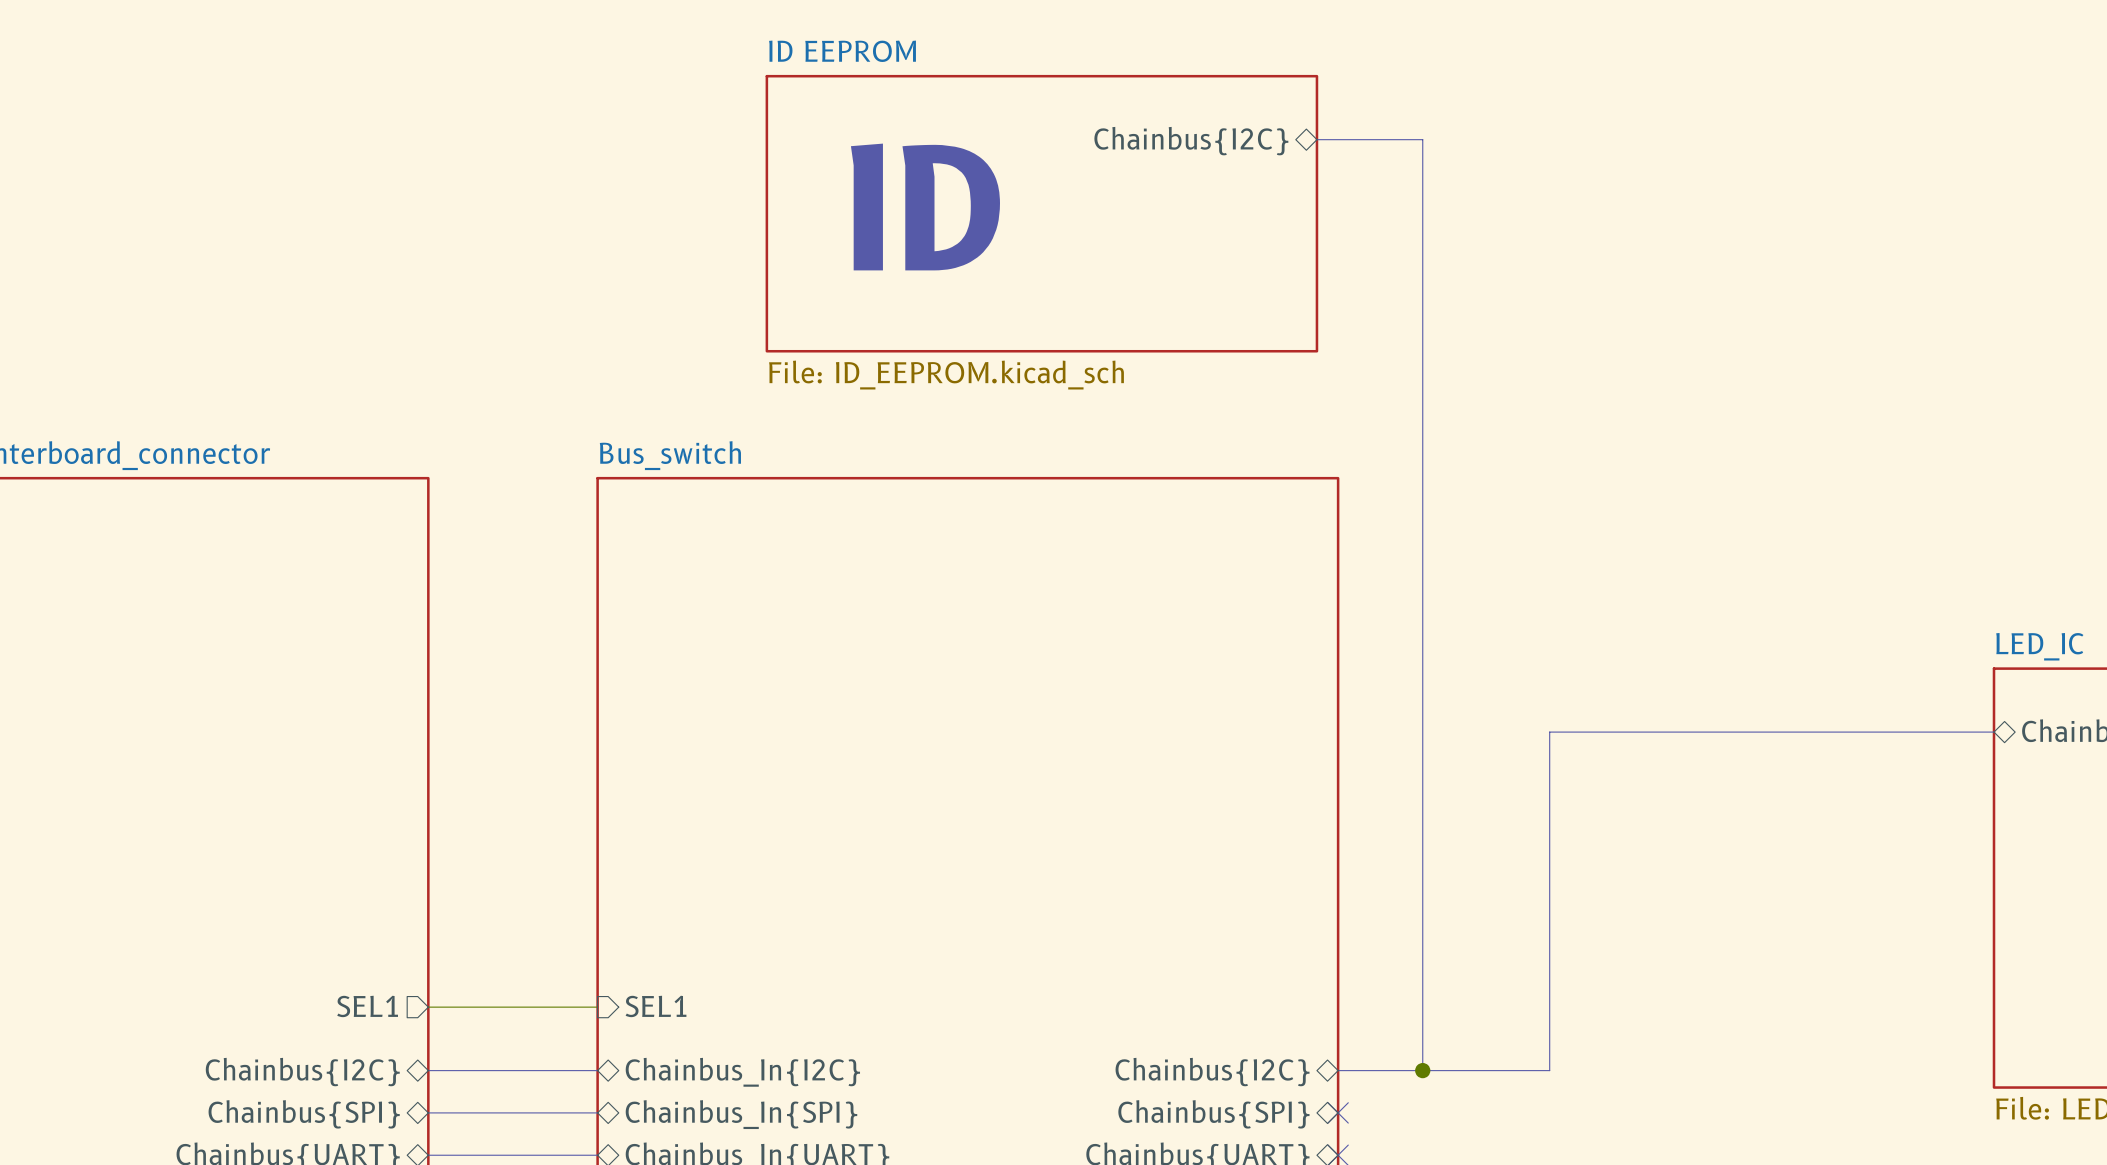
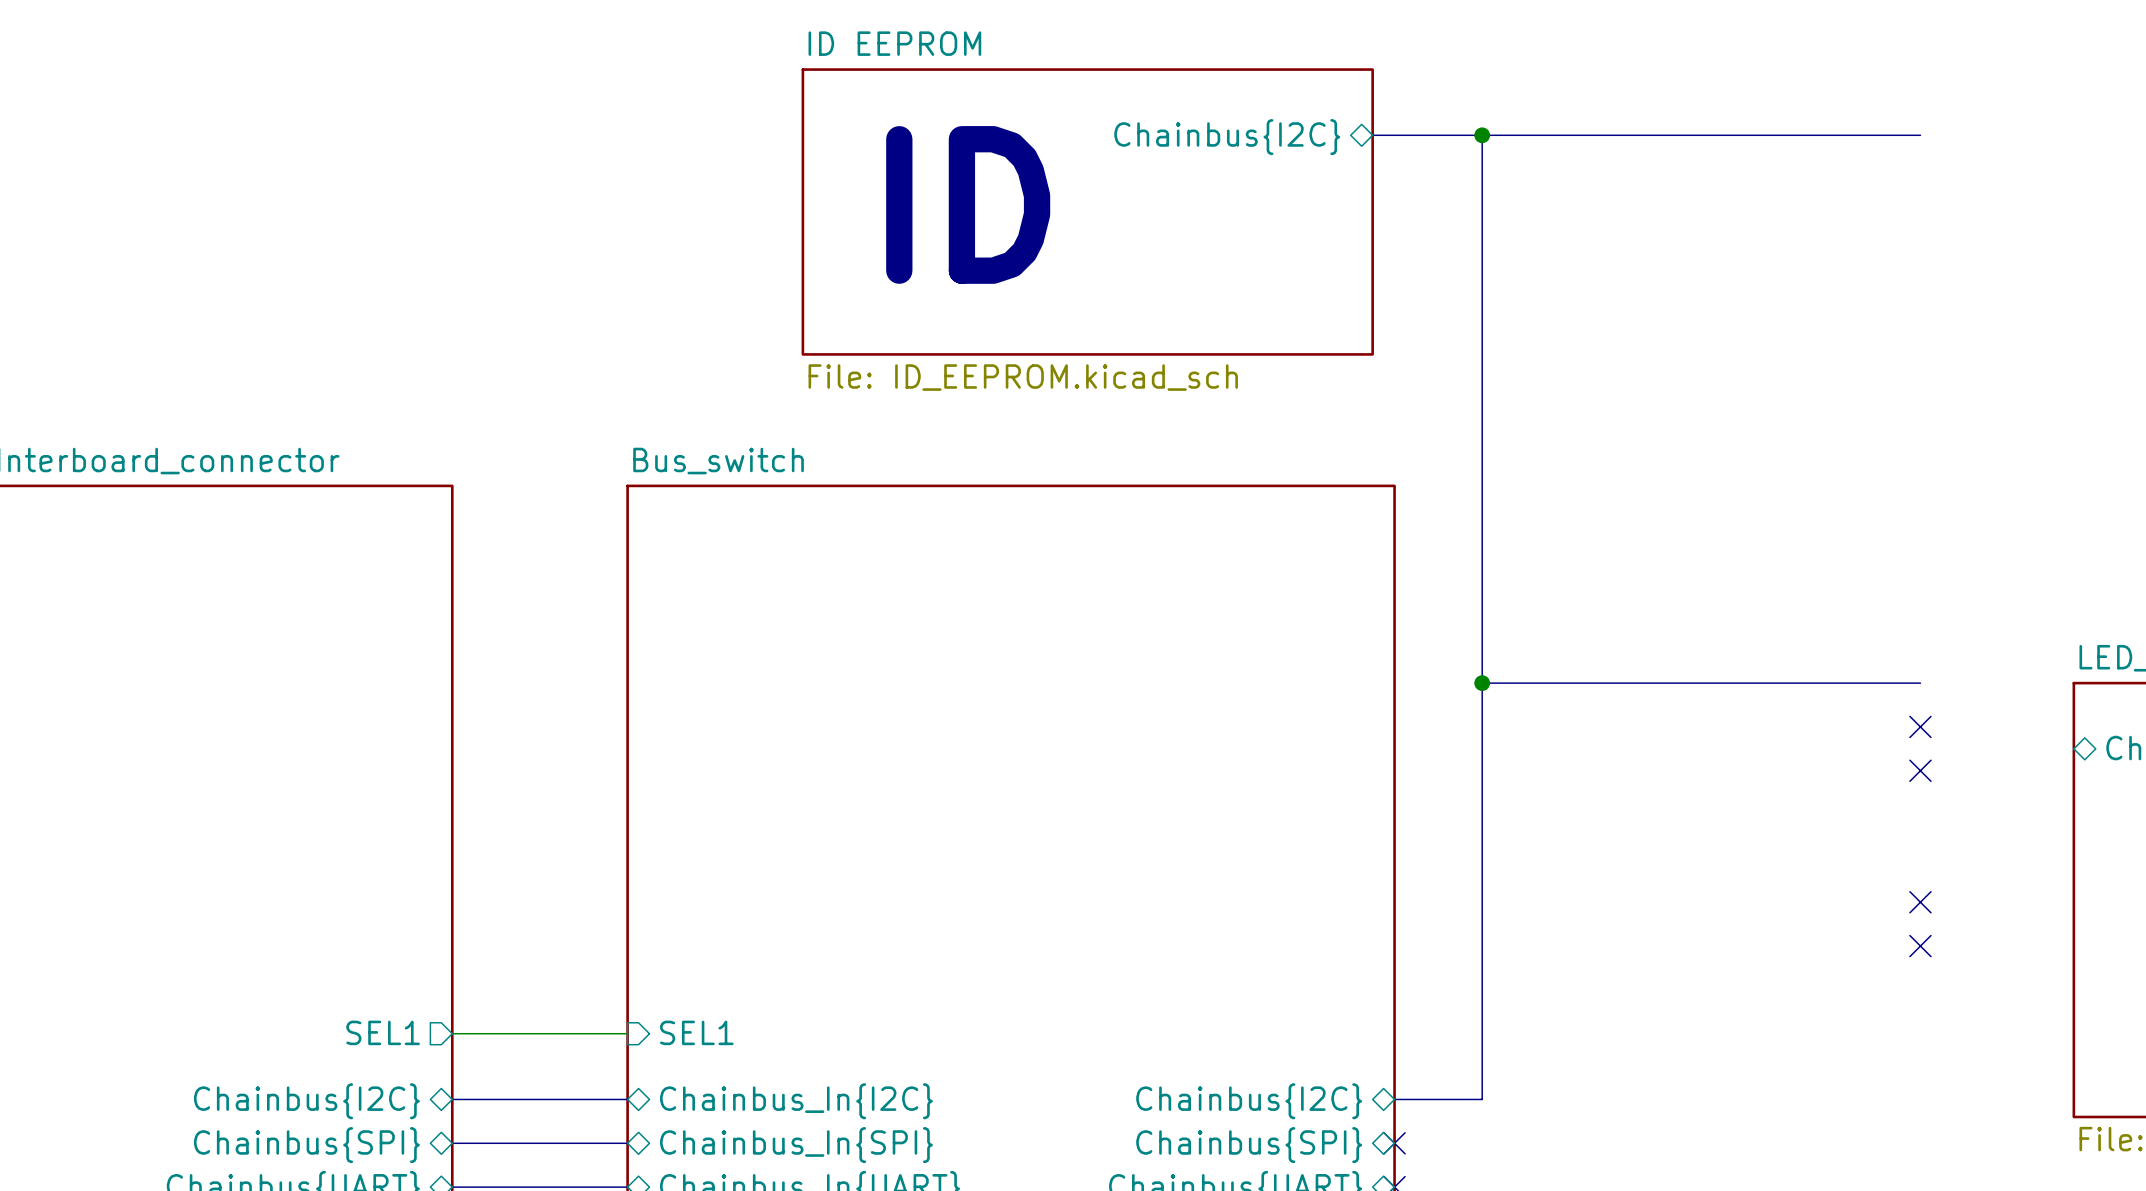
bus: none -> (1482, 135) (1920, 135)
junction: none -> (1482, 135)
bus: none -> (1482, 683) (1920, 683)
junction: none -> (1482, 683)
no-connect mark: none -> (1920, 726)
bus: (1994, 732) (1549, 732) (1549, 1070) (1422, 1070) -> none
no-connect mark: none -> (1920, 770)
no-connect mark: none -> (1920, 902)
no-connect mark: none -> (1920, 946)
junction: (1422, 1070) -> none

